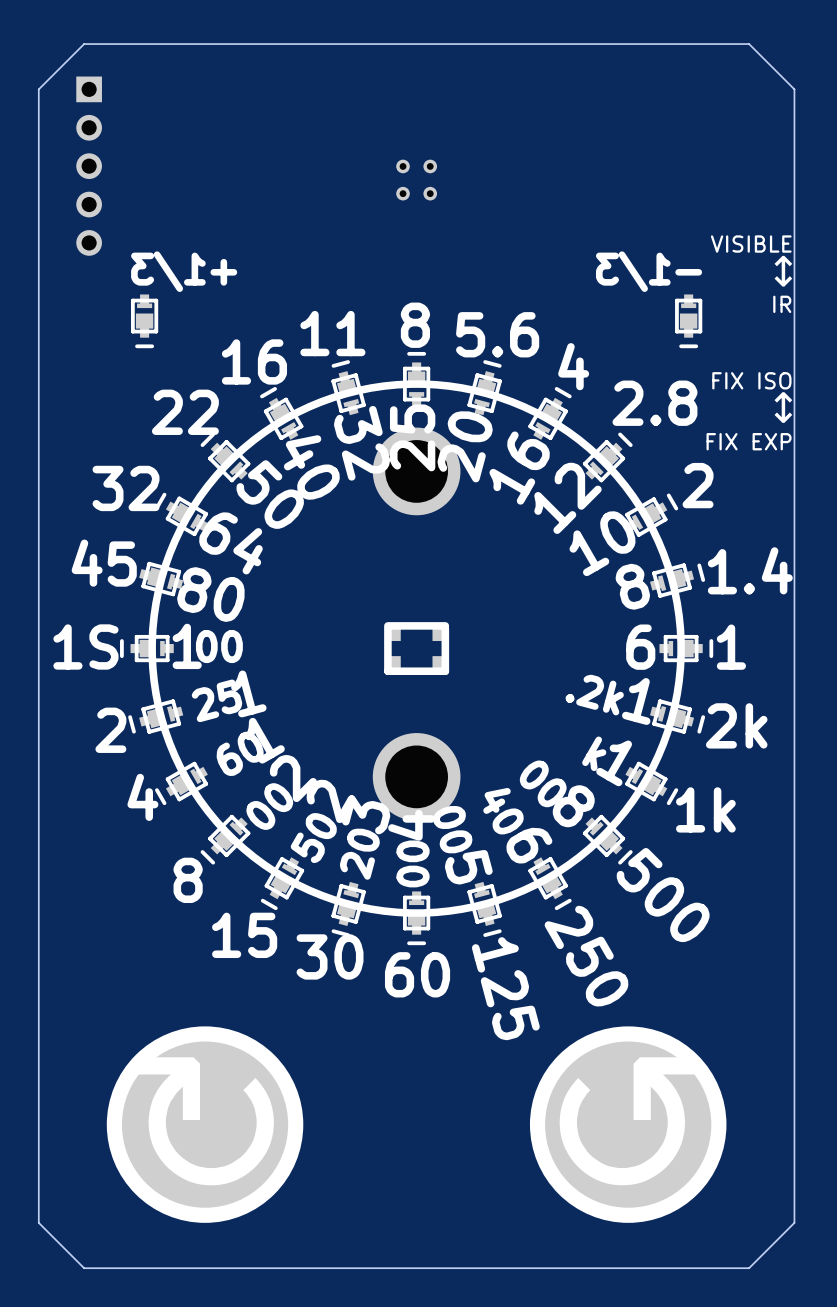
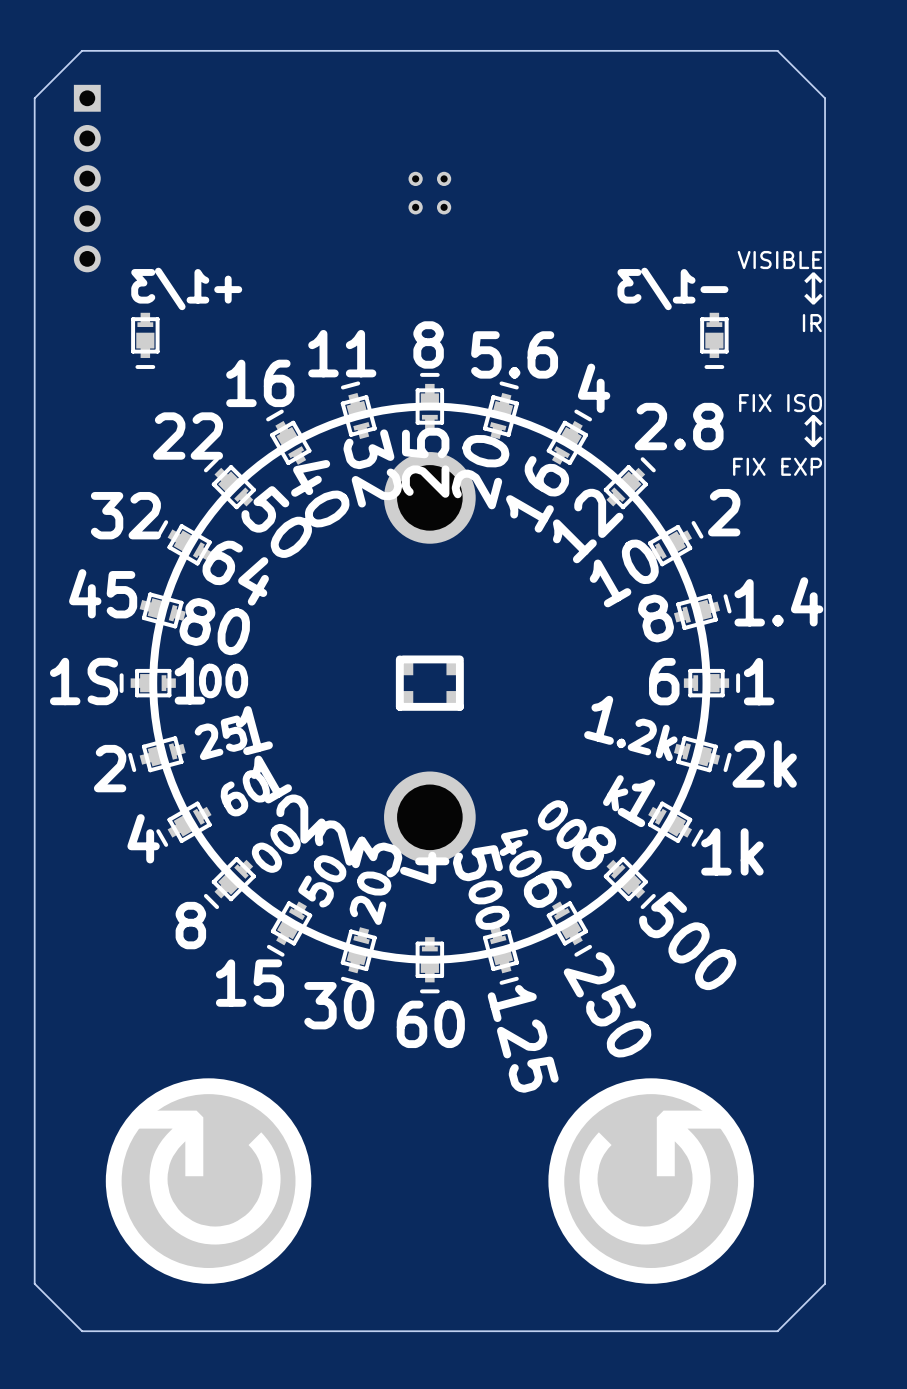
text position: .2k (594, 695) -> .2k (647, 739)
text position: 1 (636, 701) -> 1 (599, 720)
text: 00 (452, 829) -> none
text: none -> 00 (489, 905)
text: 00 (413, 863) -> none
text position: 5 (468, 867) -> 5 (477, 863)

